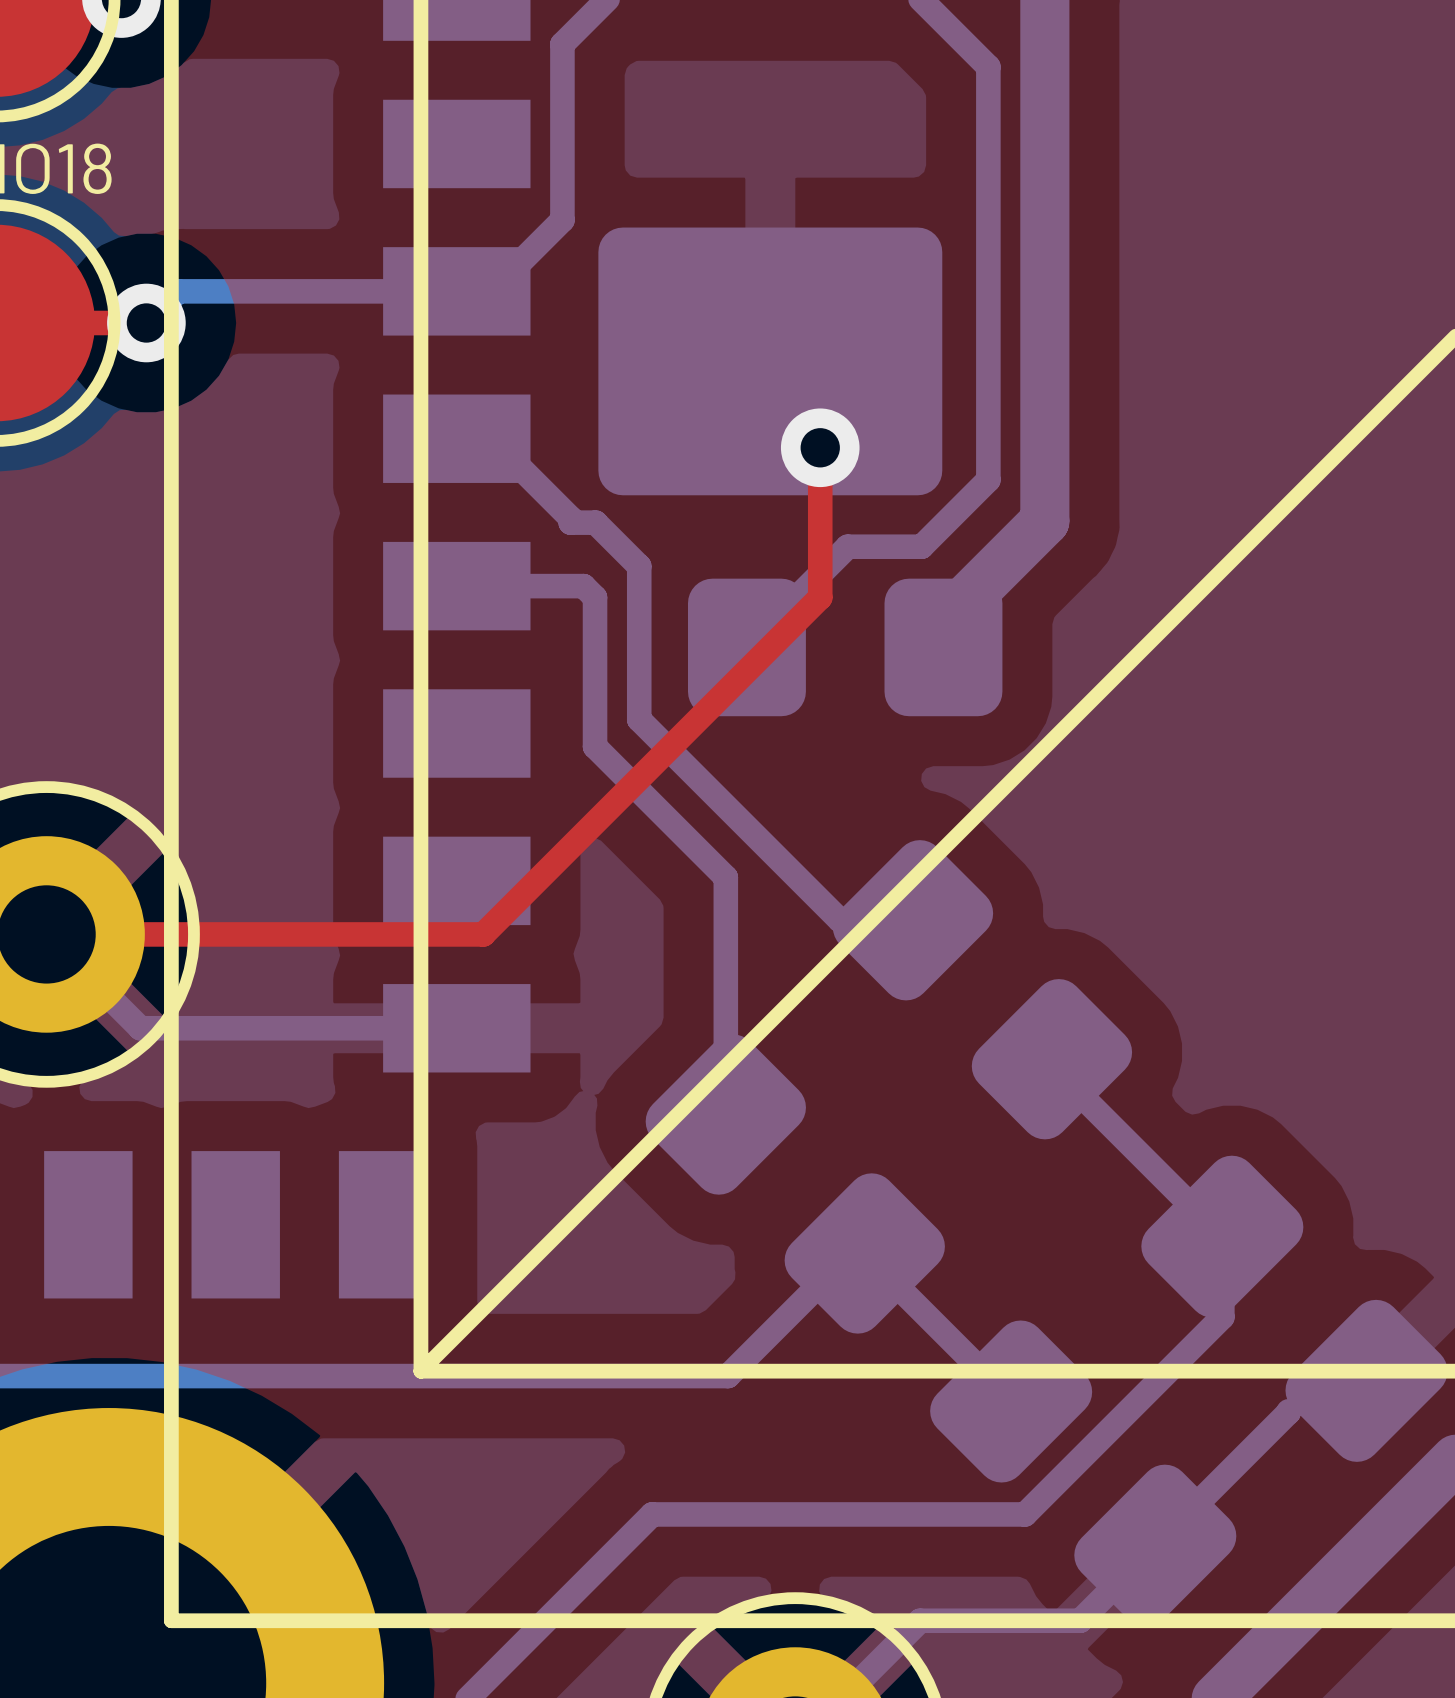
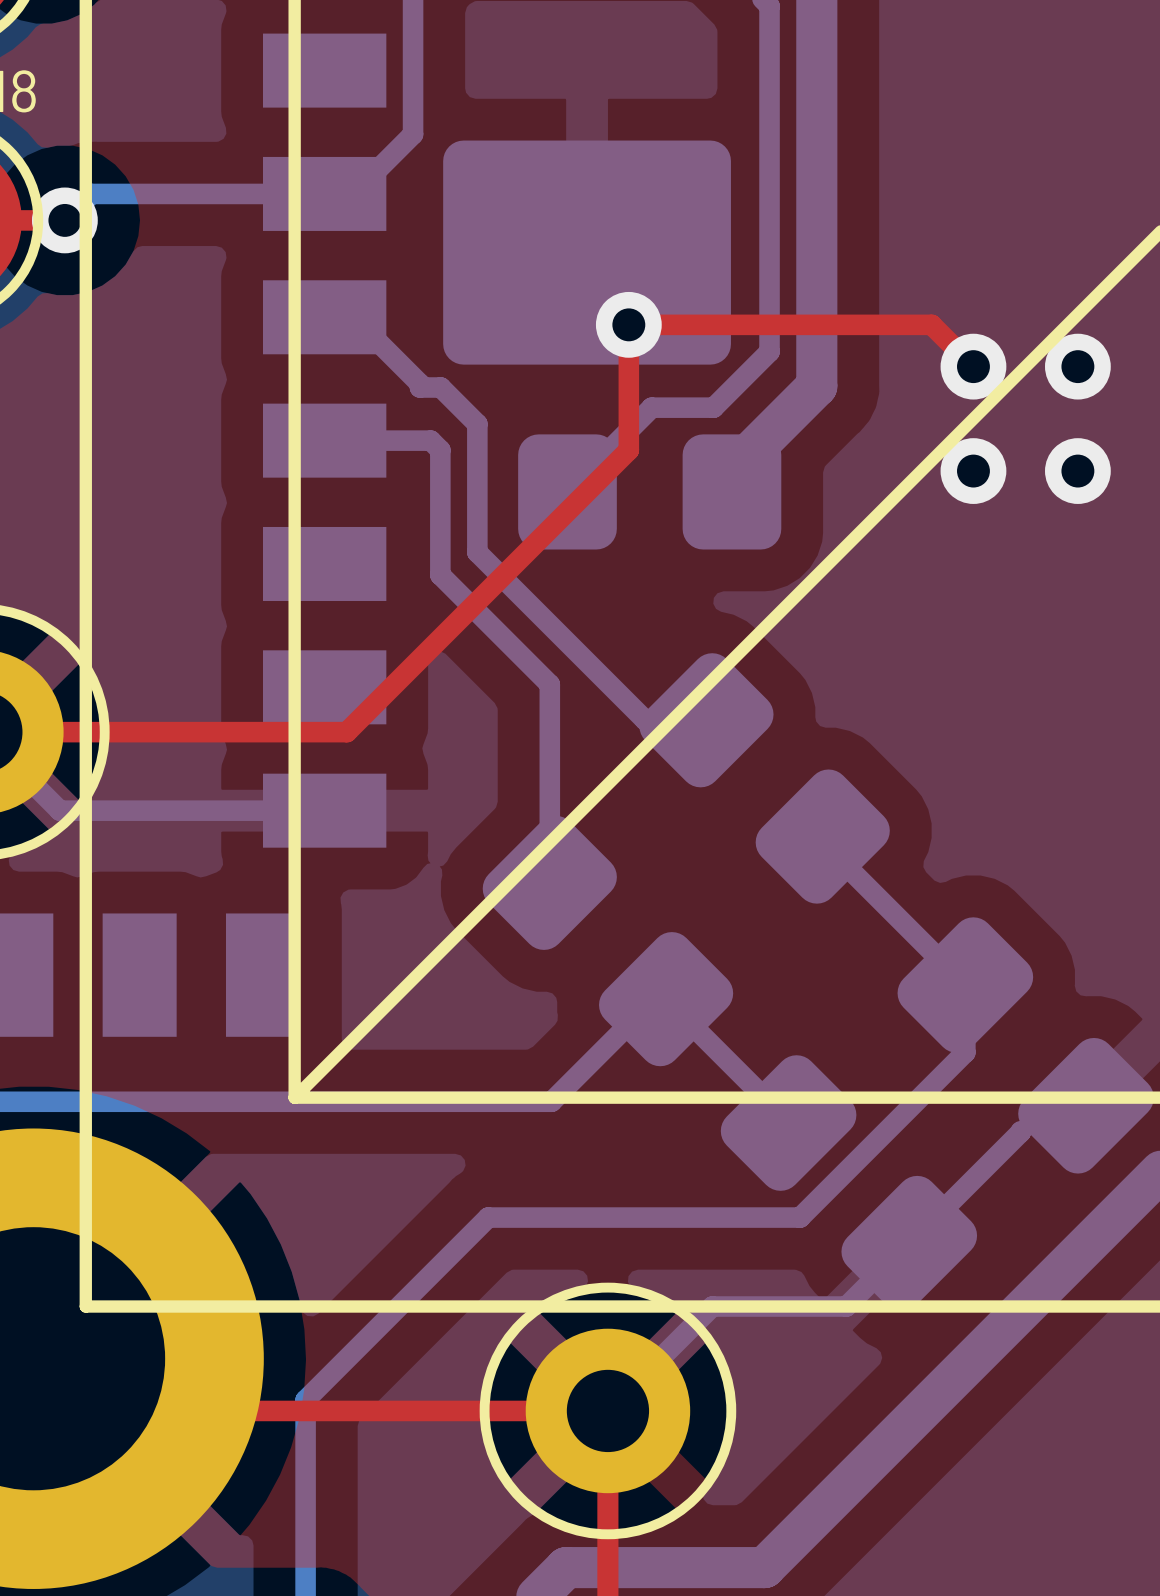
top track: none -> (628, 324) (931, 324) (973, 366)
via: none -> (973, 366)
via: none -> (1077, 366)
via: none -> (973, 471)
via: none -> (1077, 471)

